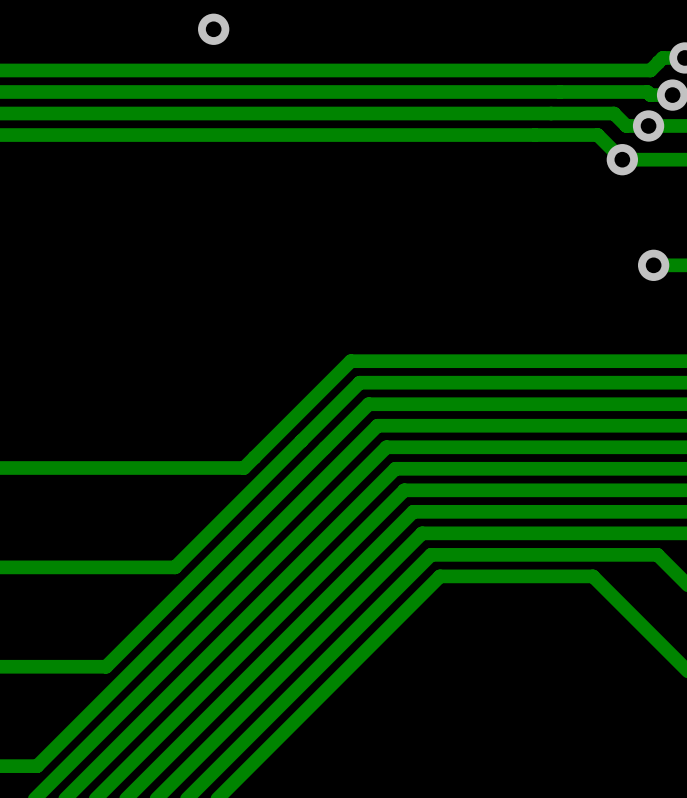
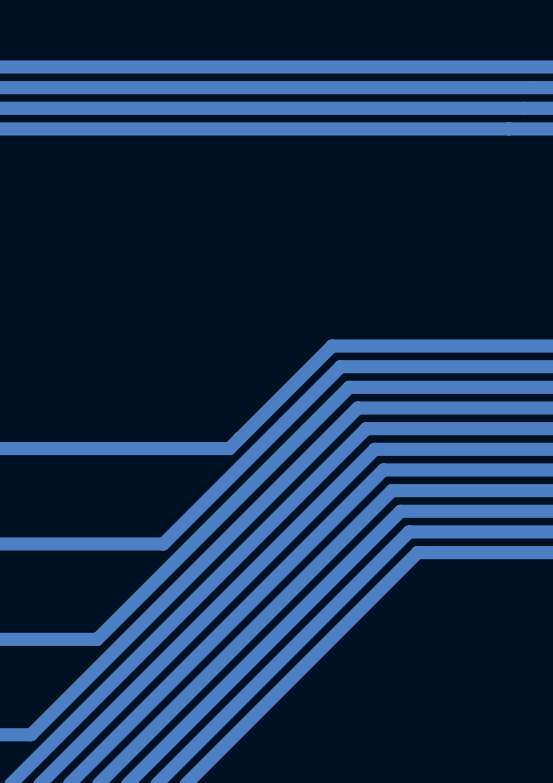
via: (213, 29) -> none

